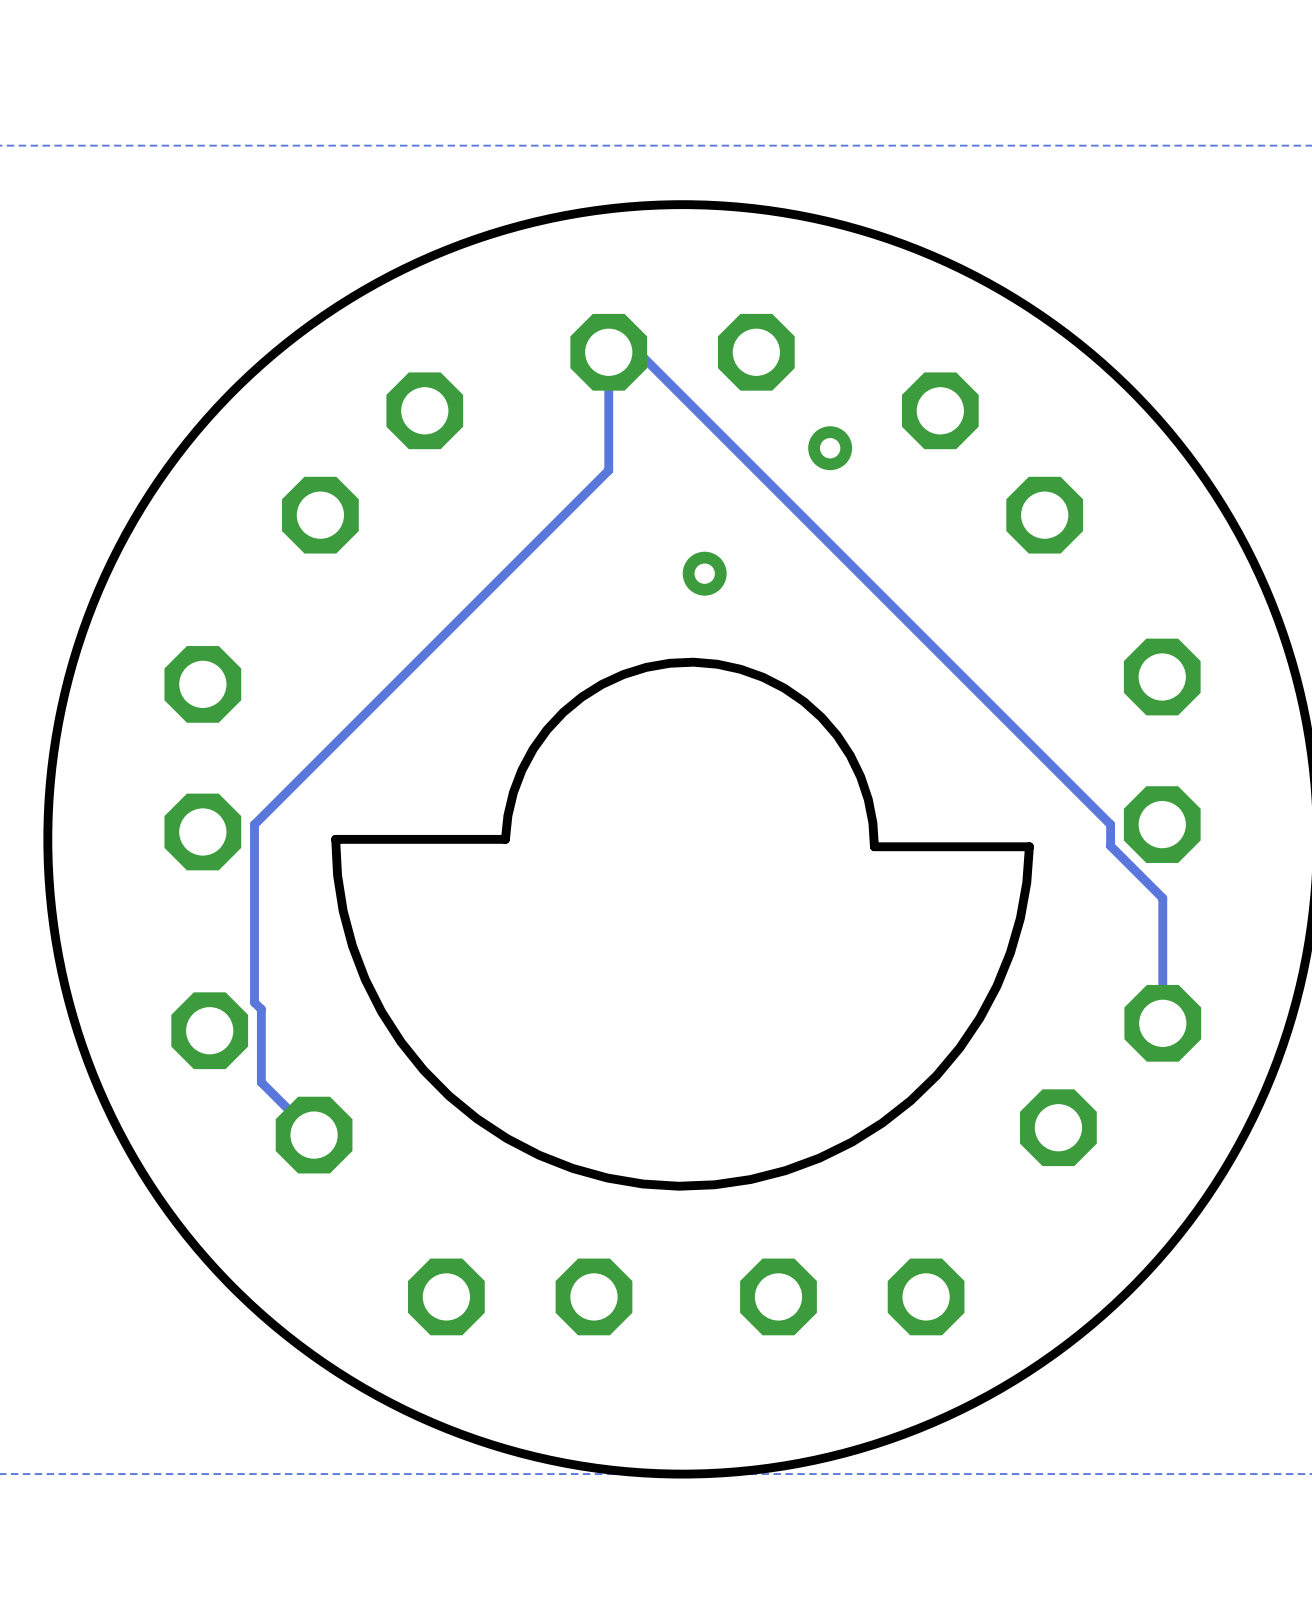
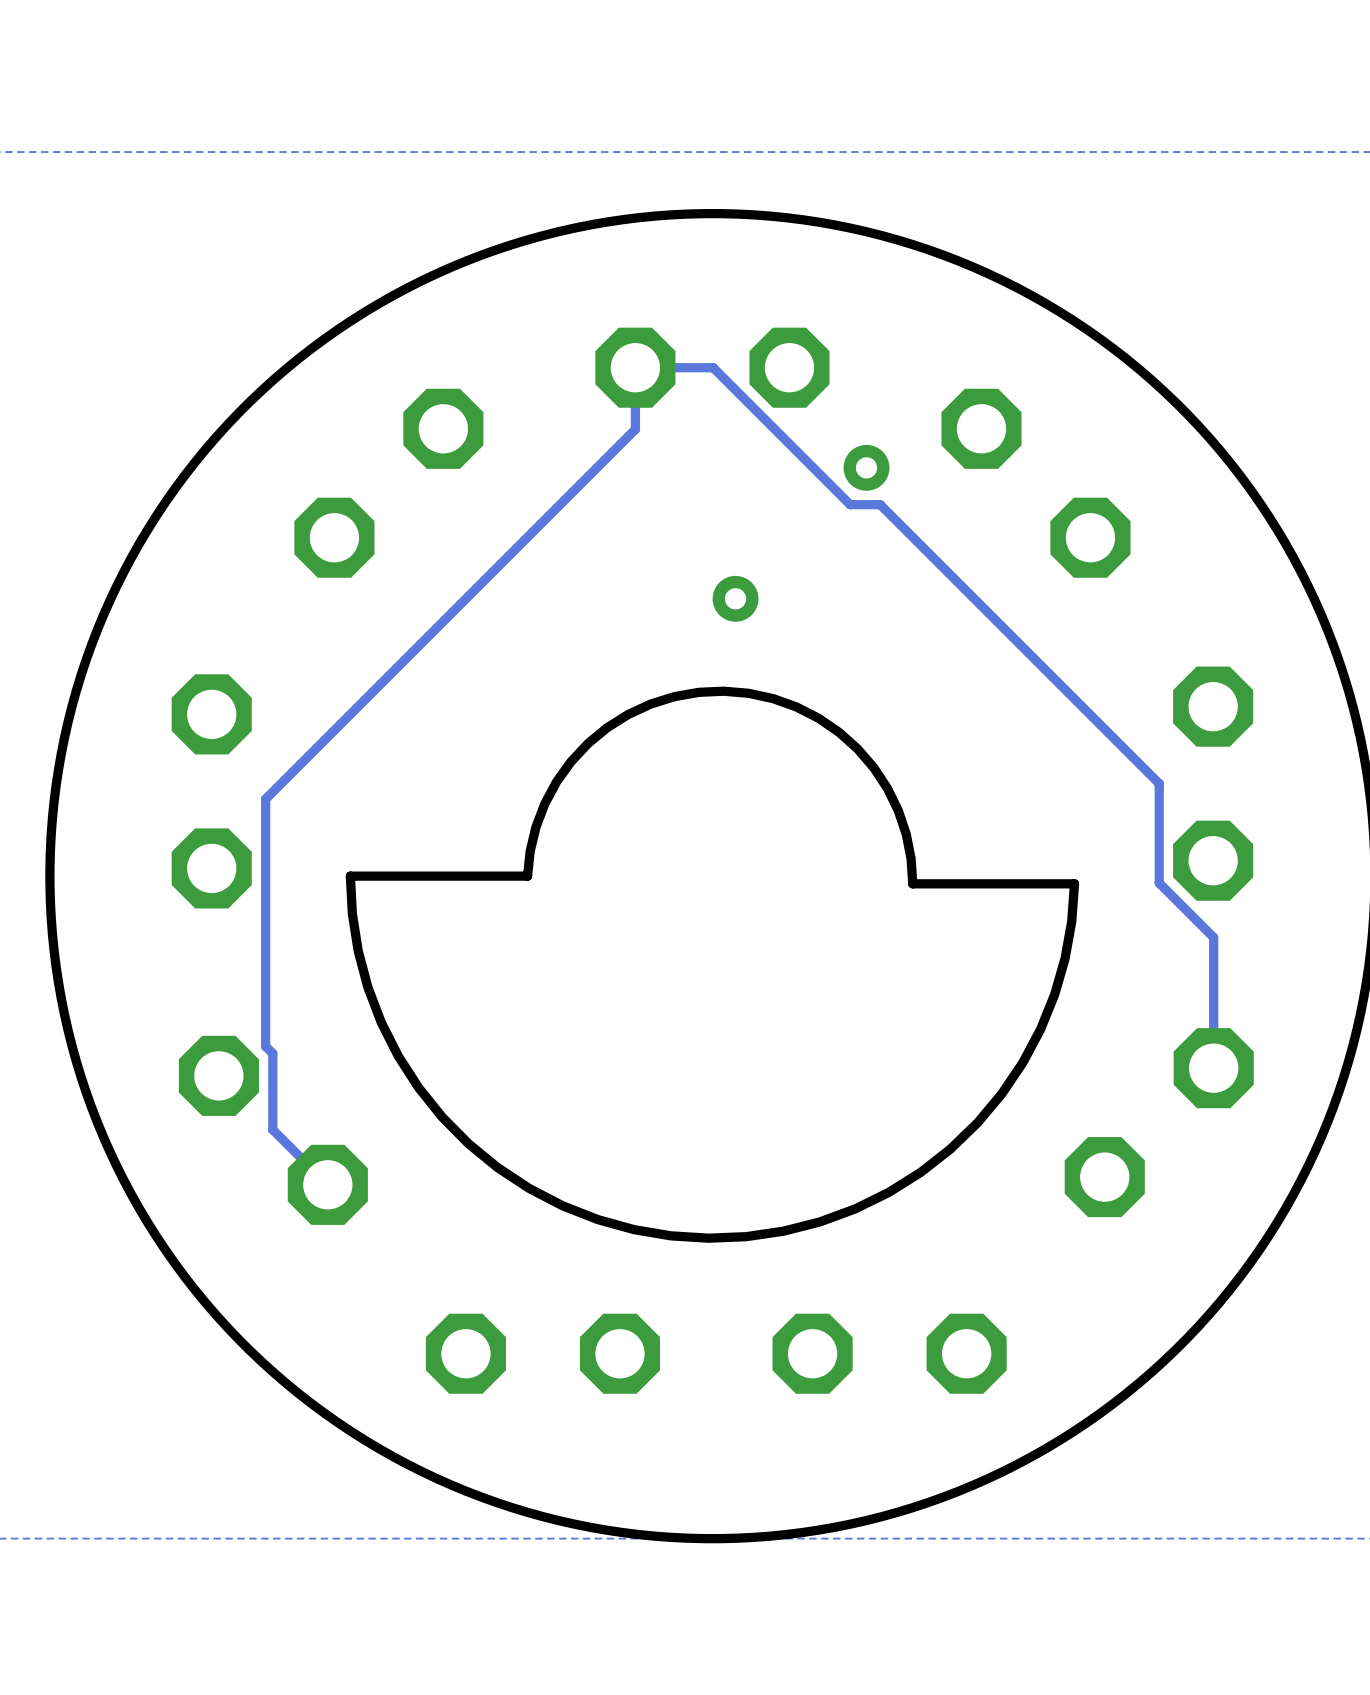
track: (638, 352) (1110, 824) -> (666, 367) (713, 367) (850, 504) (880, 504) (1159, 783) (1159, 860)
track: (608, 411) (608, 470) (254, 824) -> (635, 429) (265, 799) (265, 860)

